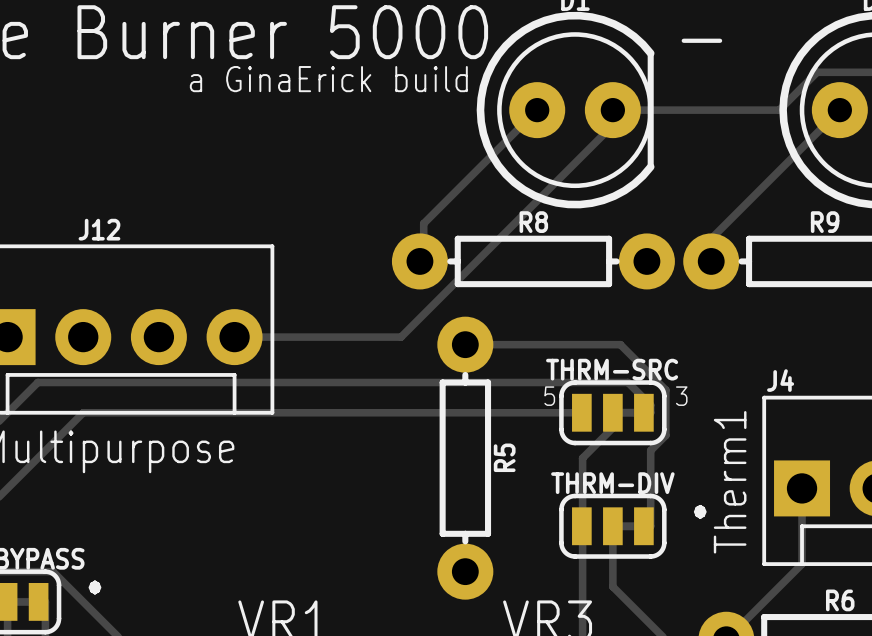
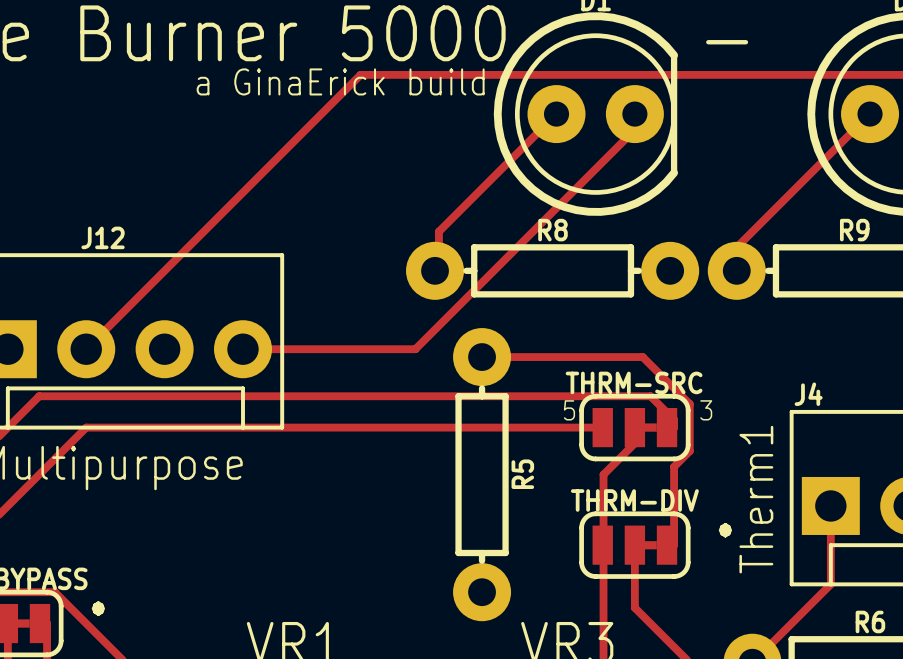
track: (817, 72) (779, 110) (612, 110) -> (846, 74) (360, 74) (86, 349)

